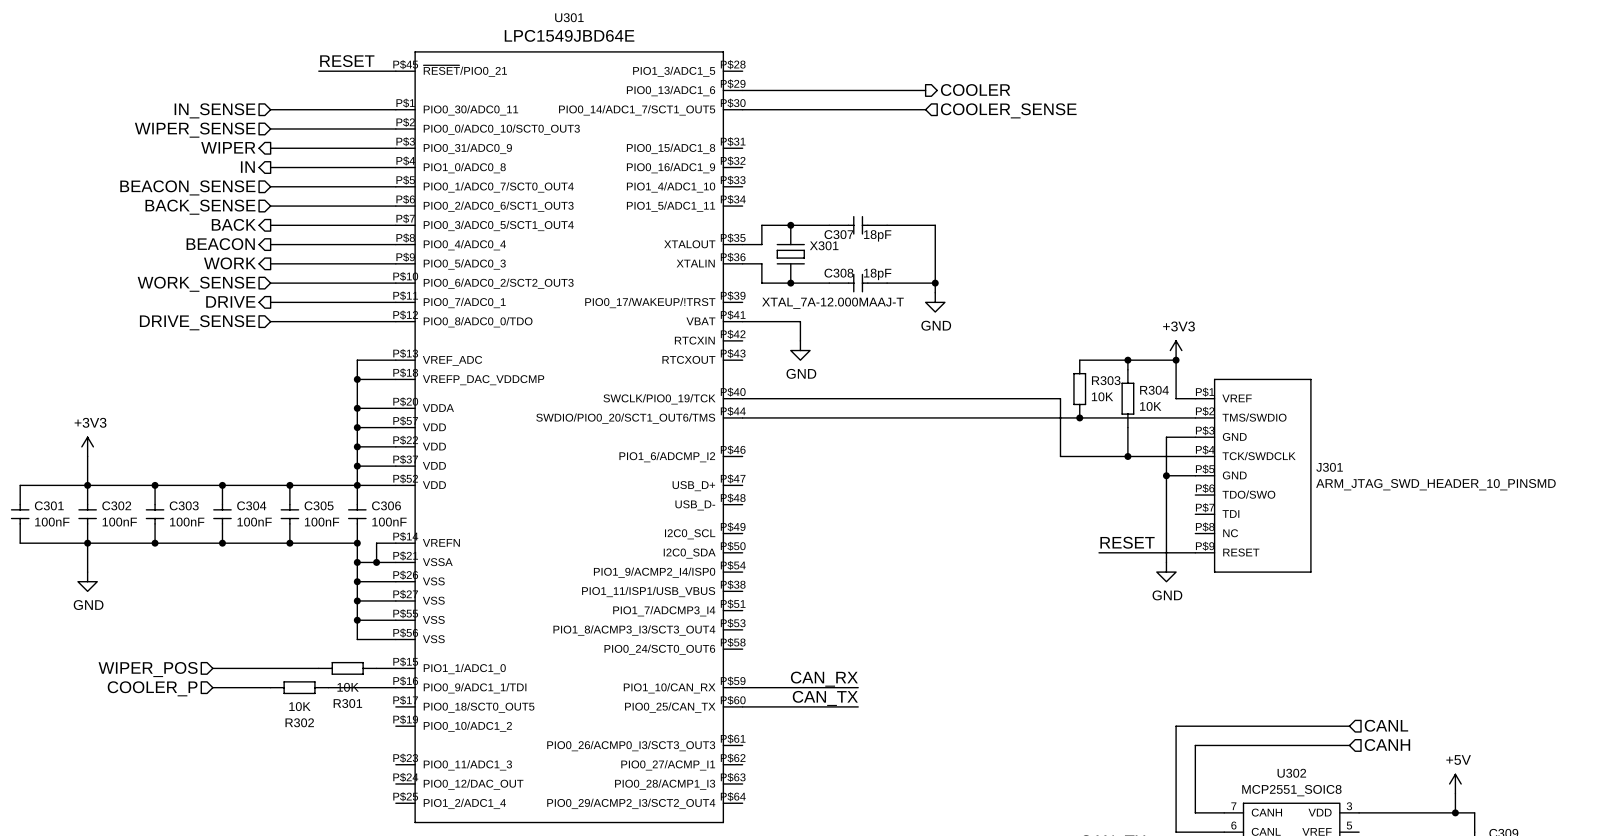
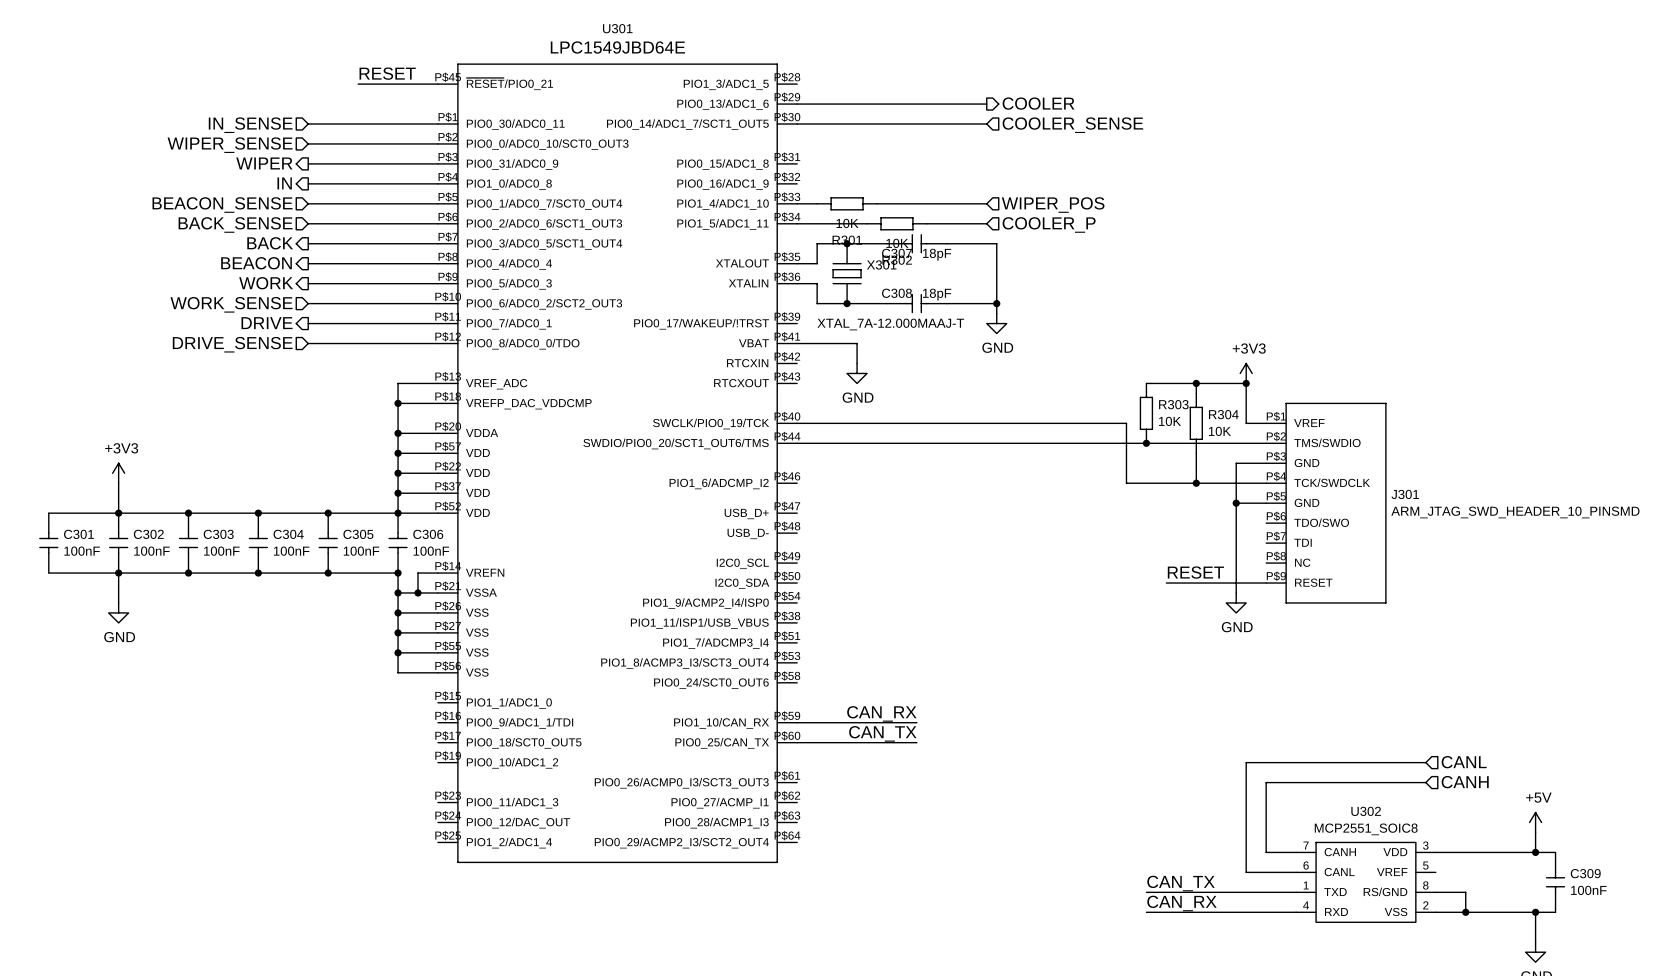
wire: none -> (797, 203) (817, 203)
wire: none -> (877, 203) (986, 203)
hierarchical label: none -> WIPER_POS (1053, 205)
wire: none -> (797, 223) (867, 223)
wire: none -> (926, 223) (986, 223)
hierarchical label: none -> COOLER_P (1049, 224)
wire: (212, 668) (318, 668) -> none
R301 position: (347, 668) -> (847, 203)
wire: (376, 668) (395, 668) -> none
hierarchical label: WIPER_POS (148, 669) -> none
wire: (212, 687) (270, 687) -> none
R302 position: (299, 687) -> (896, 223)
wire: (328, 687) (395, 687) -> none
hierarchical label: COOLER_P (152, 688) -> none

